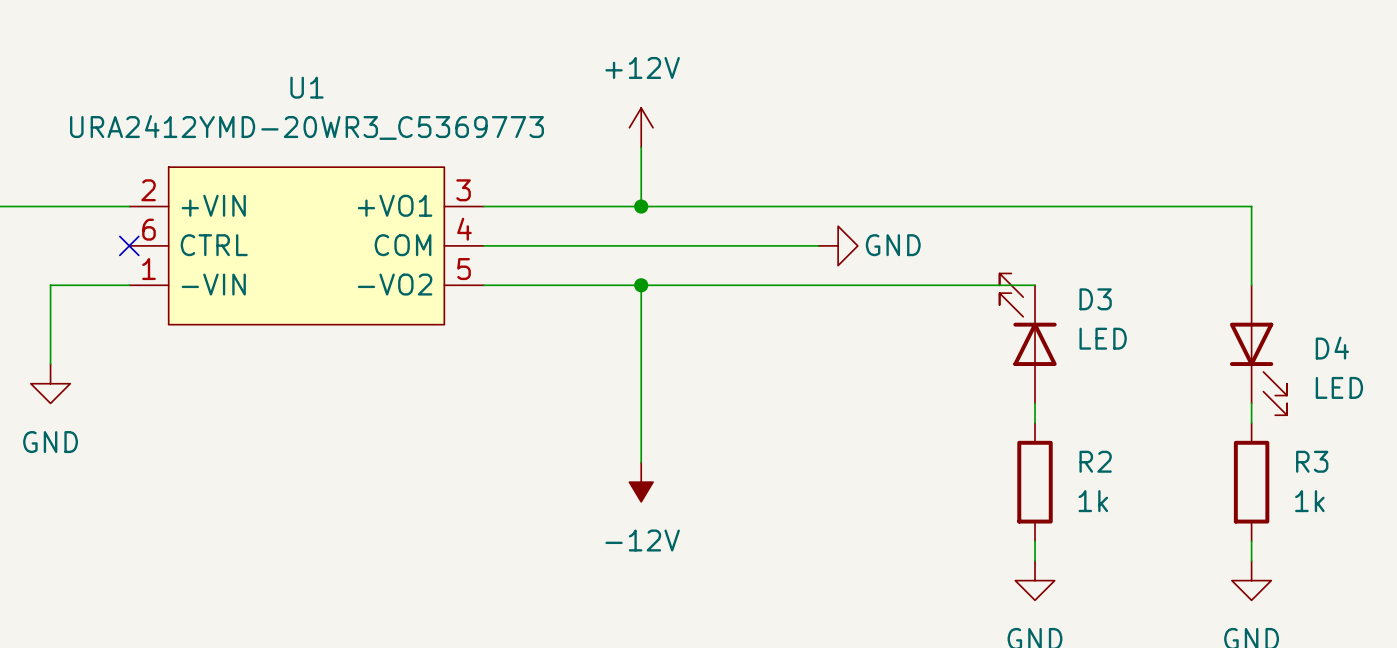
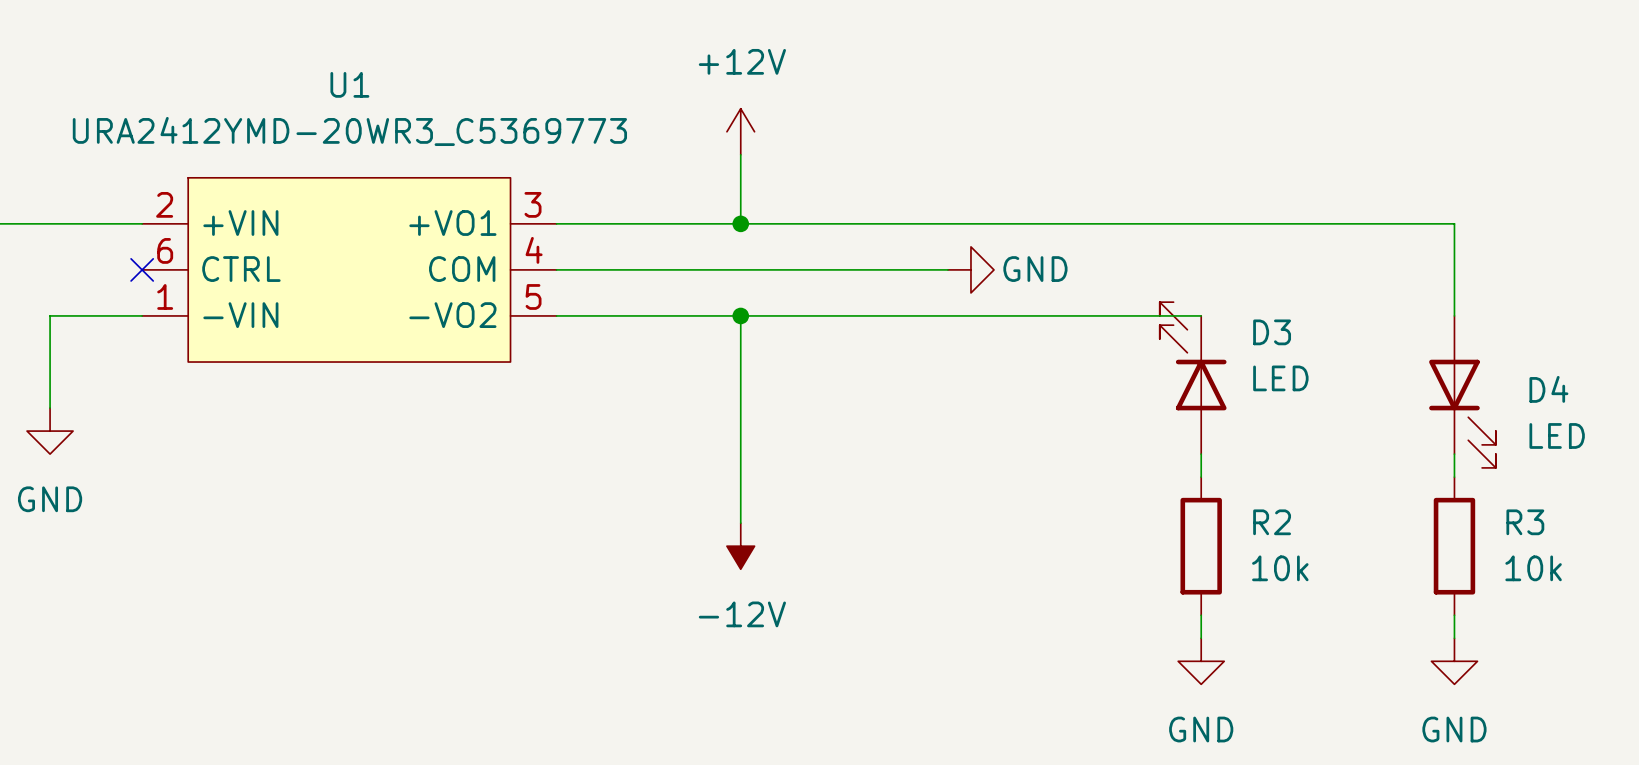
R2 value: 1k (1093, 501) -> 10k (1280, 568)
R3 value: 1k (1309, 501) -> 10k (1533, 568)

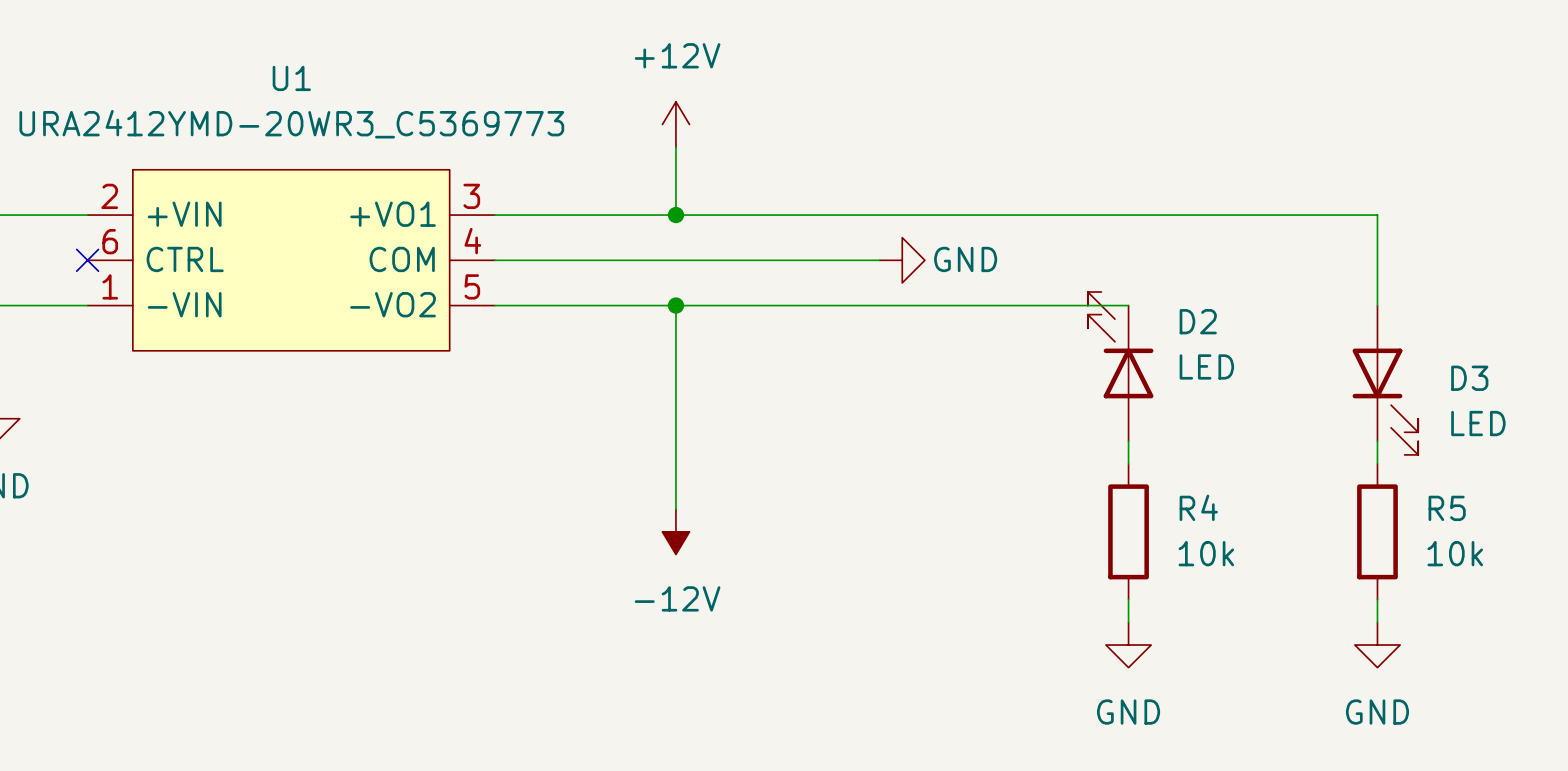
D3 name: D3 (1272, 332) -> D2 (1198, 321)
D4 name: D4 (1548, 389) -> D3 (1469, 378)
R2 name: R2 (1272, 522) -> R4 (1198, 507)
R3 name: R3 (1525, 522) -> R5 (1447, 508)

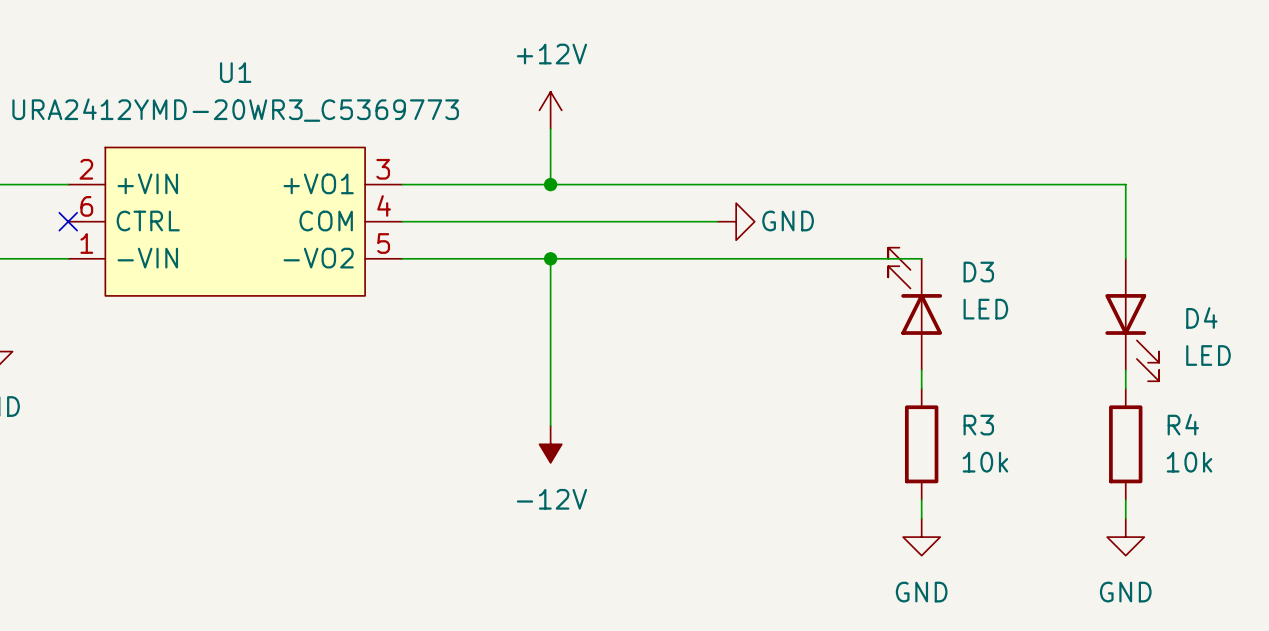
D2 name: D2 (1198, 321) -> D3 (978, 272)
D3 name: D3 (1469, 378) -> D4 (1201, 317)
R4 name: R4 (1198, 507) -> R3 (978, 425)
R5 name: R5 (1447, 508) -> R4 (1183, 424)

